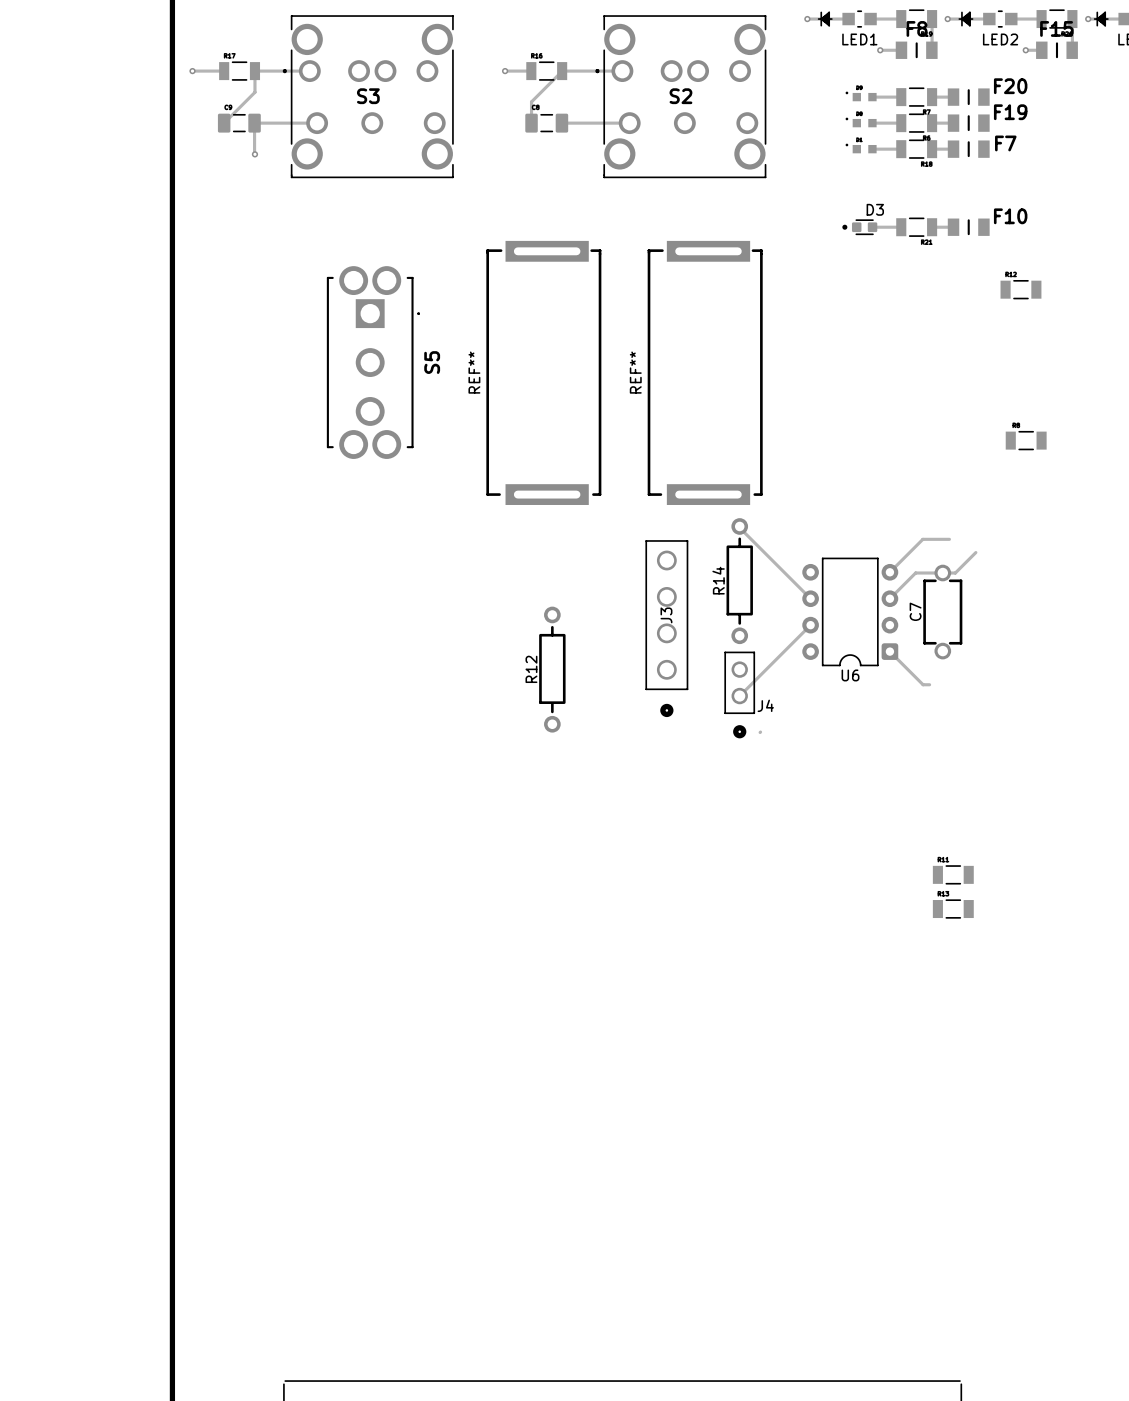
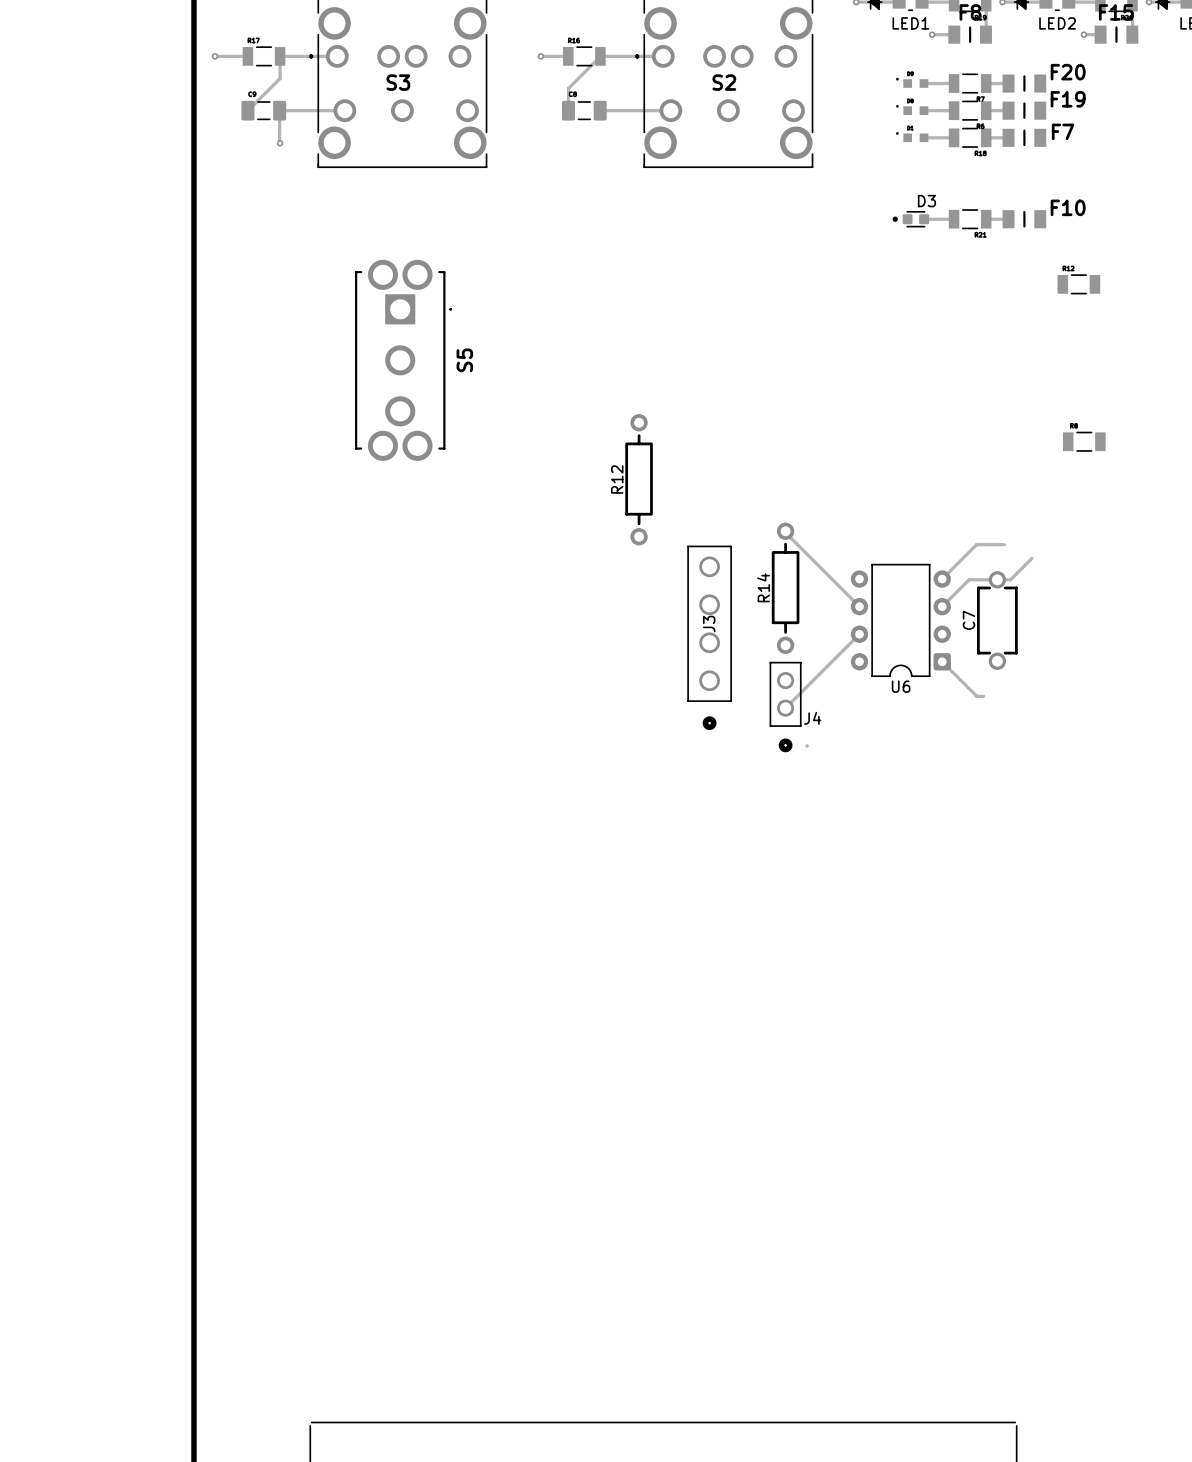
REF**: (543, 372) -> none
REF**: (705, 372) -> none
R12 position: (552, 669) -> (639, 479)
part: (953, 874) -> none
part: (953, 909) -> none

